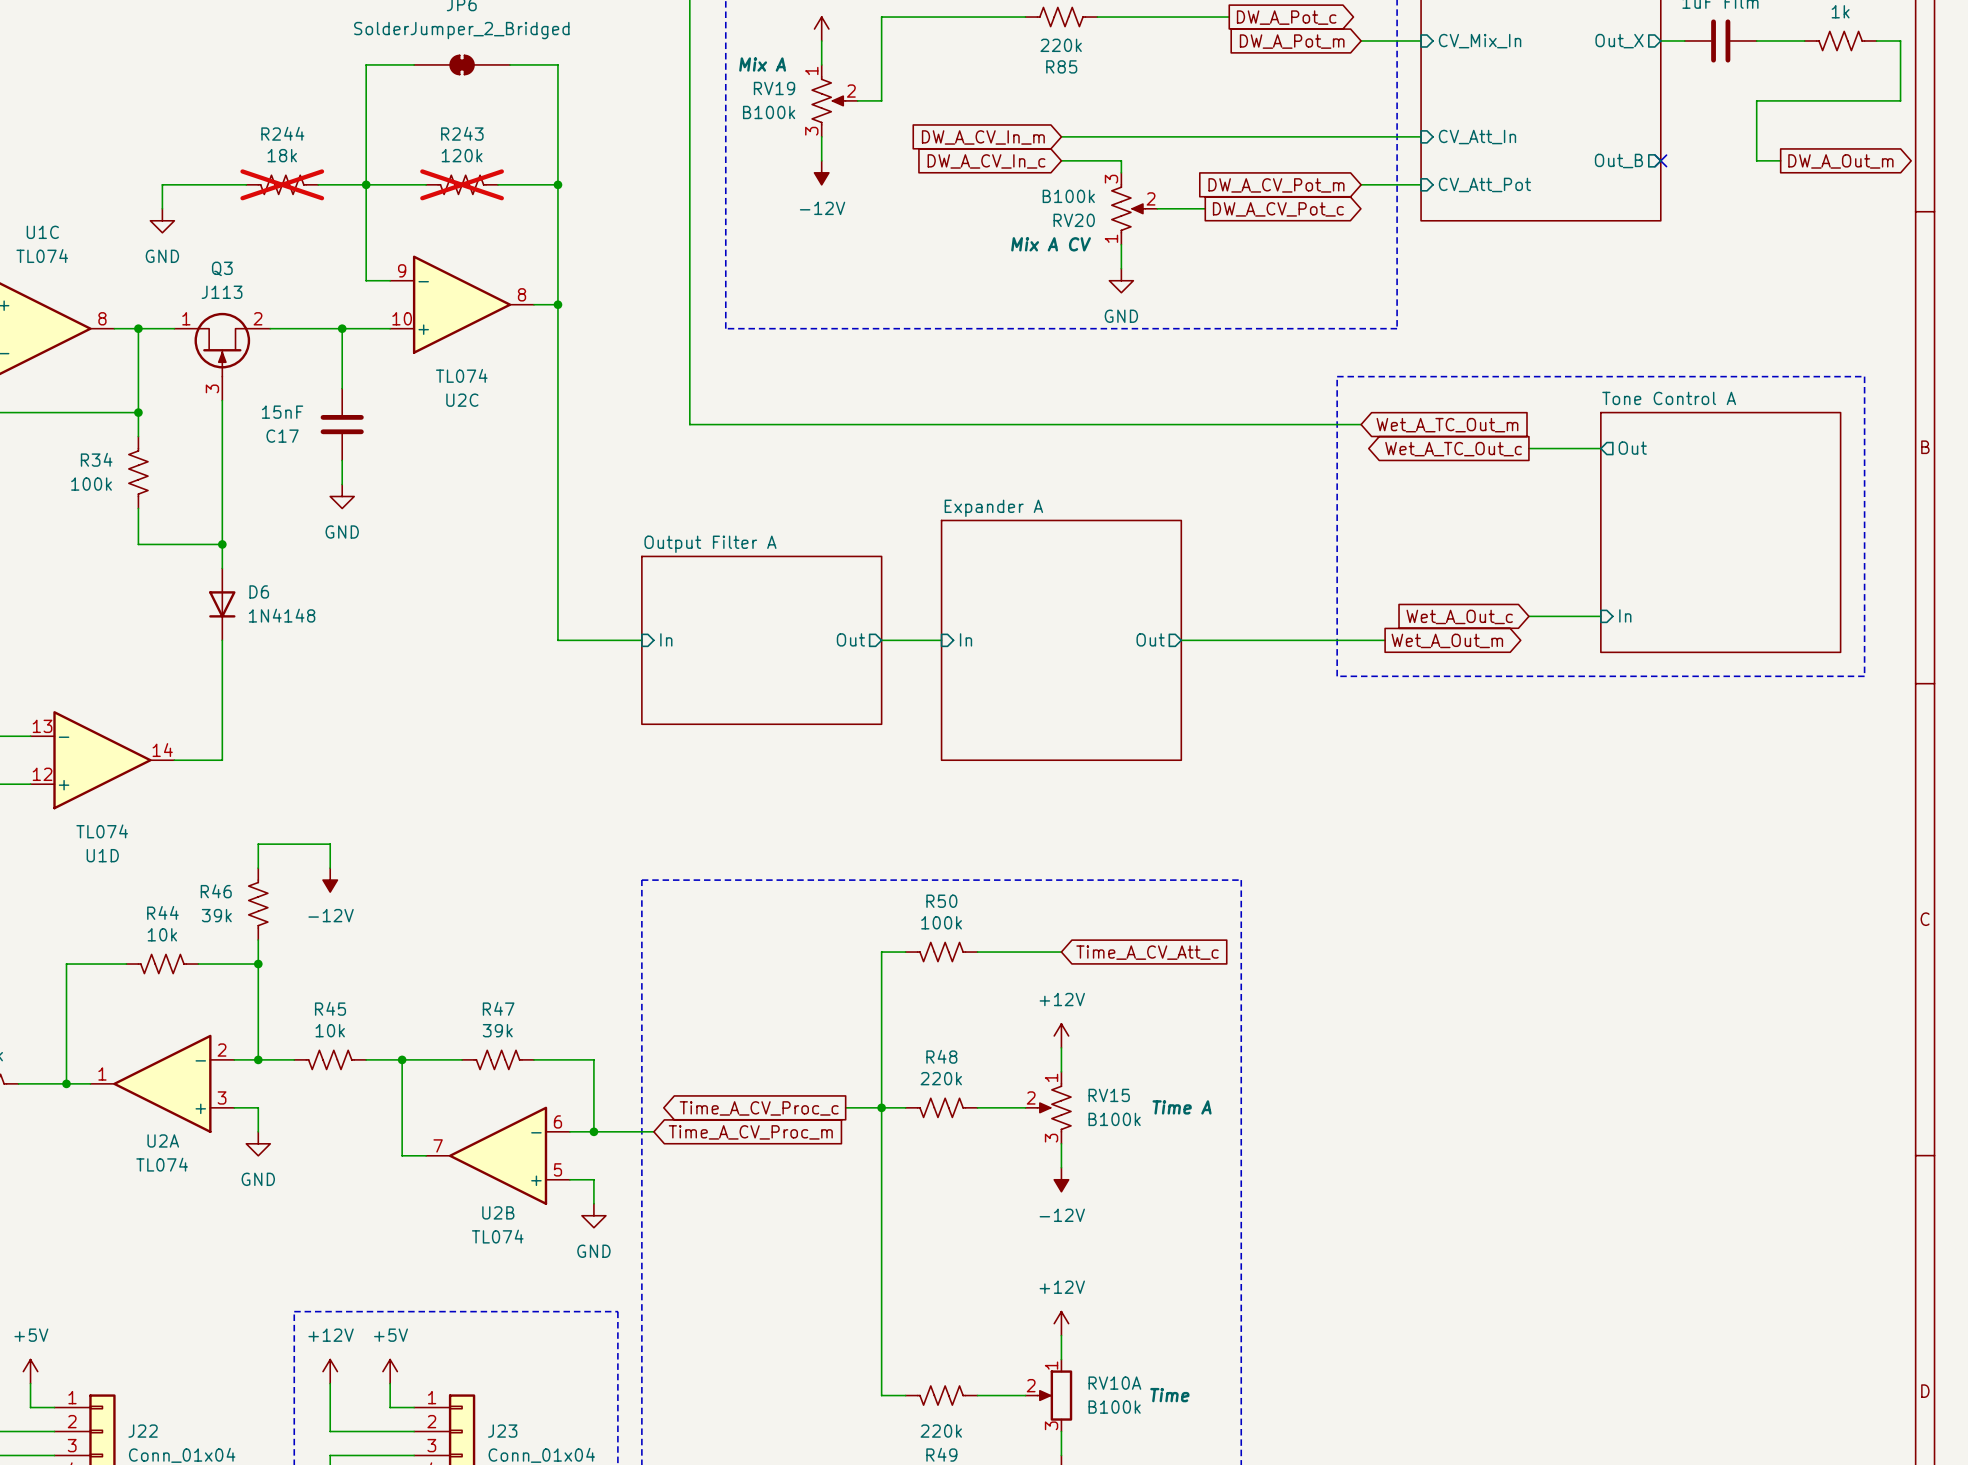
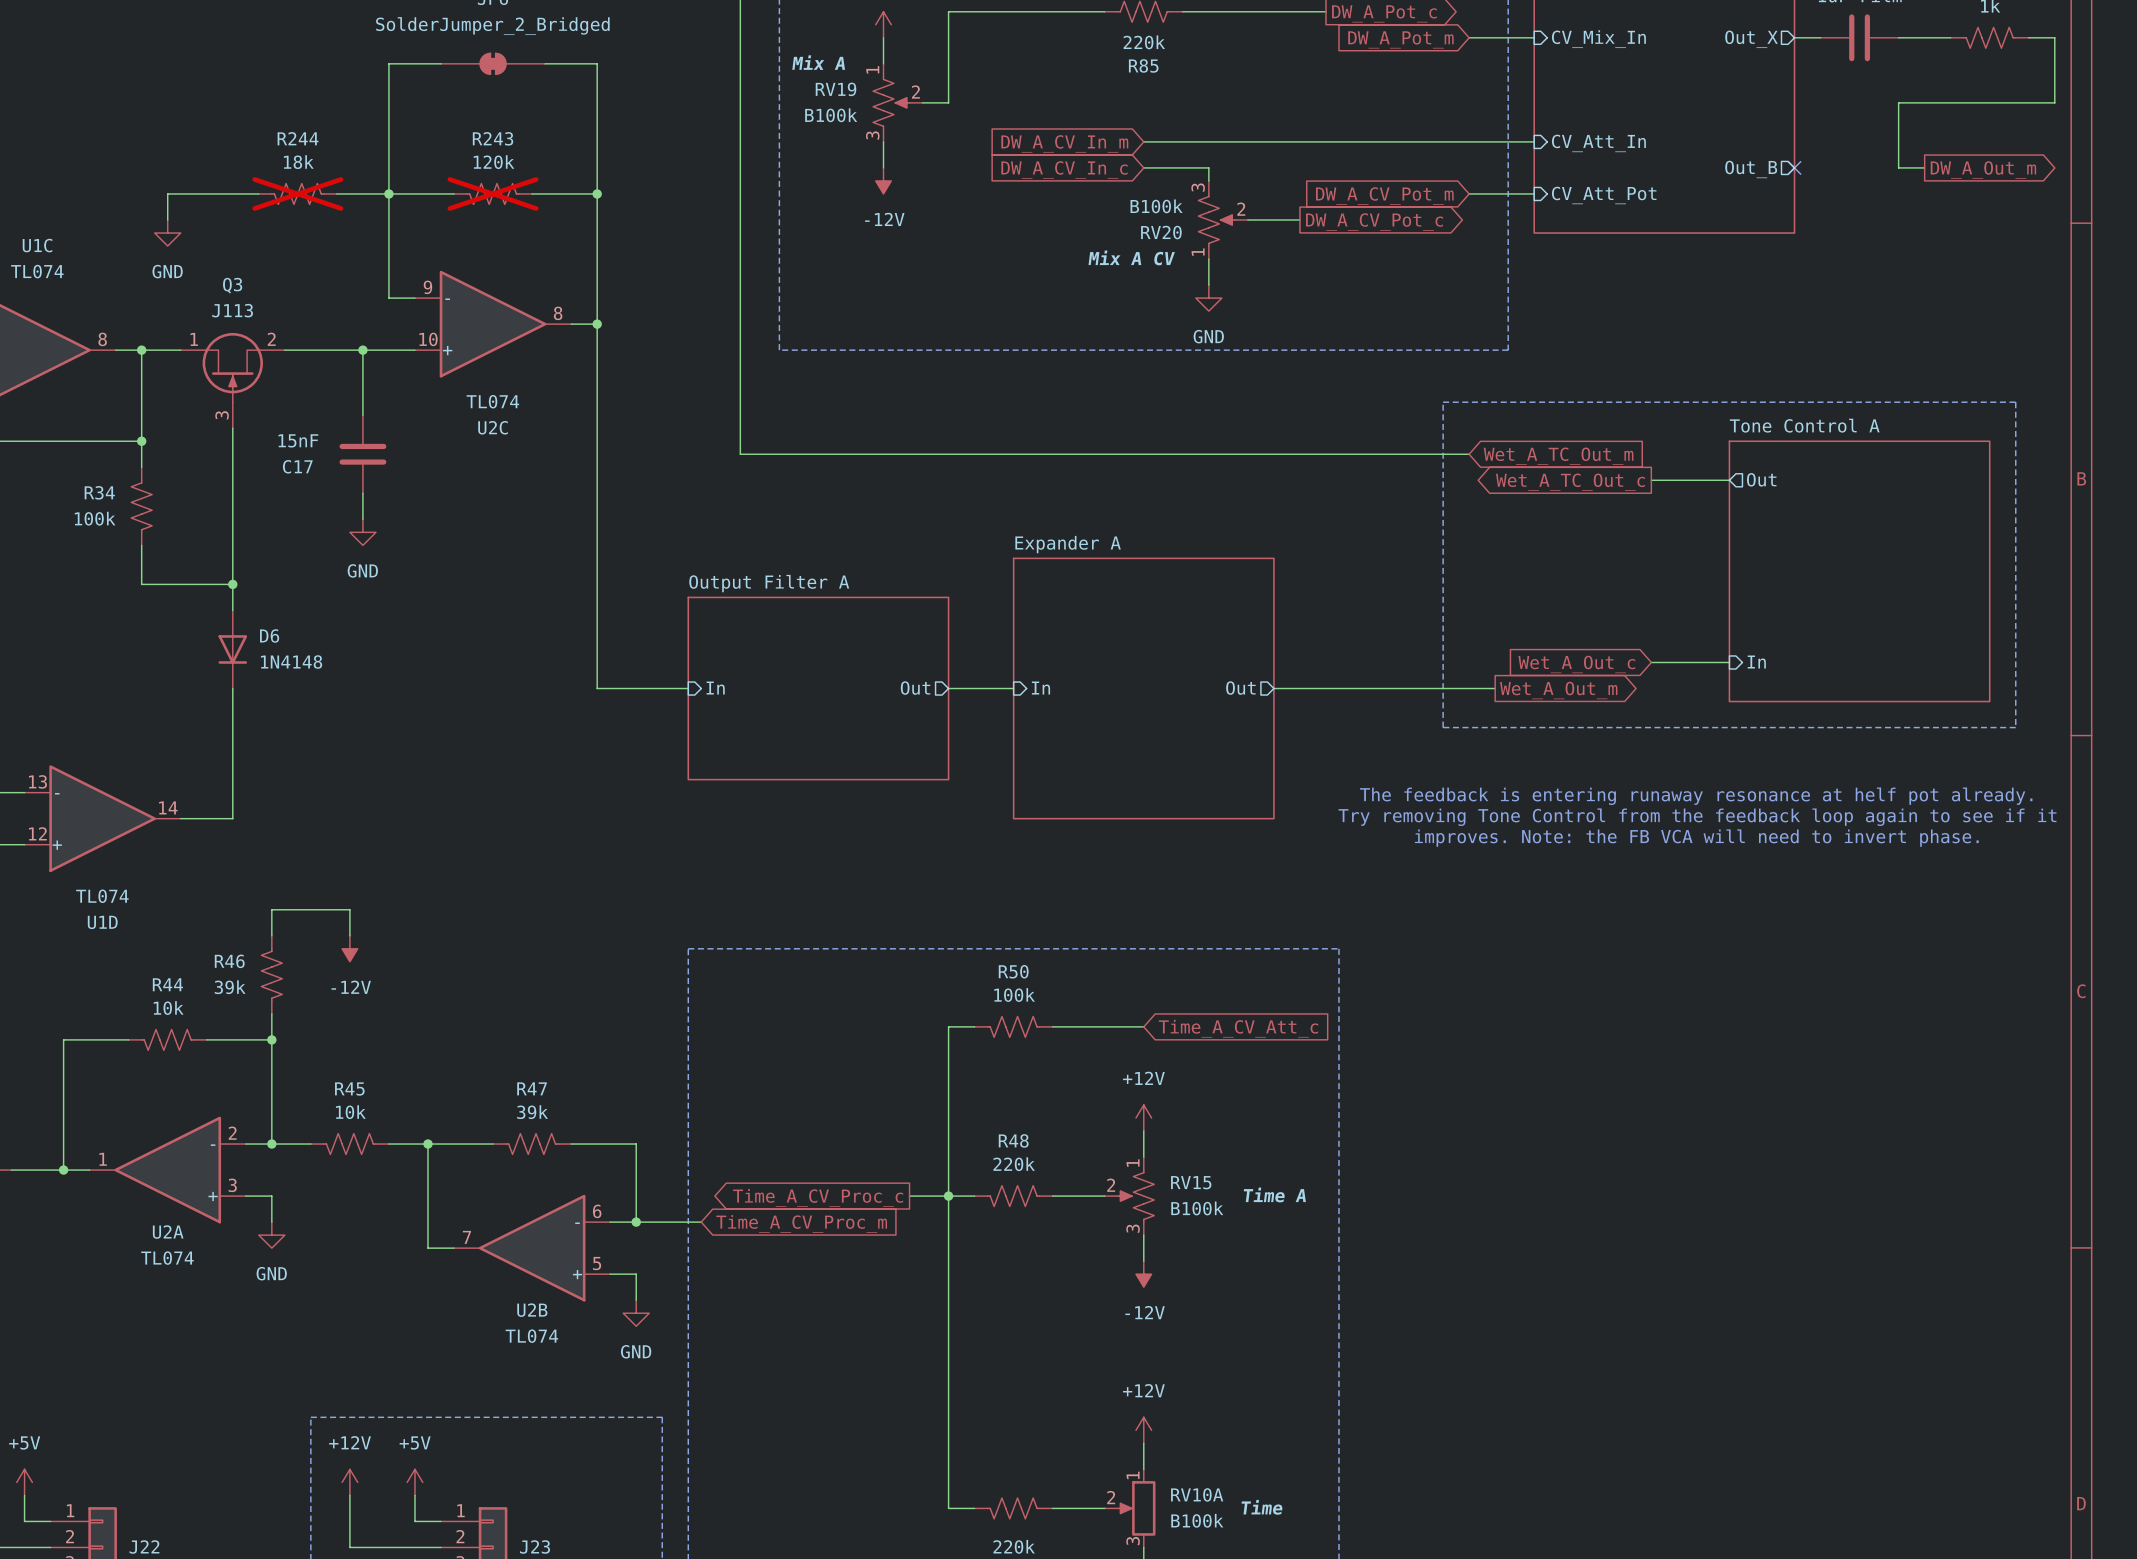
text: none -> The feedback is entering runaway resonance at helf pot already. (1696, 796)
text: none -> Try removing Tone Control from the feedback loop again to see if it (1697, 817)
text: none -> improves. Note: the FB VCA will need to invert phase. (1696, 838)

